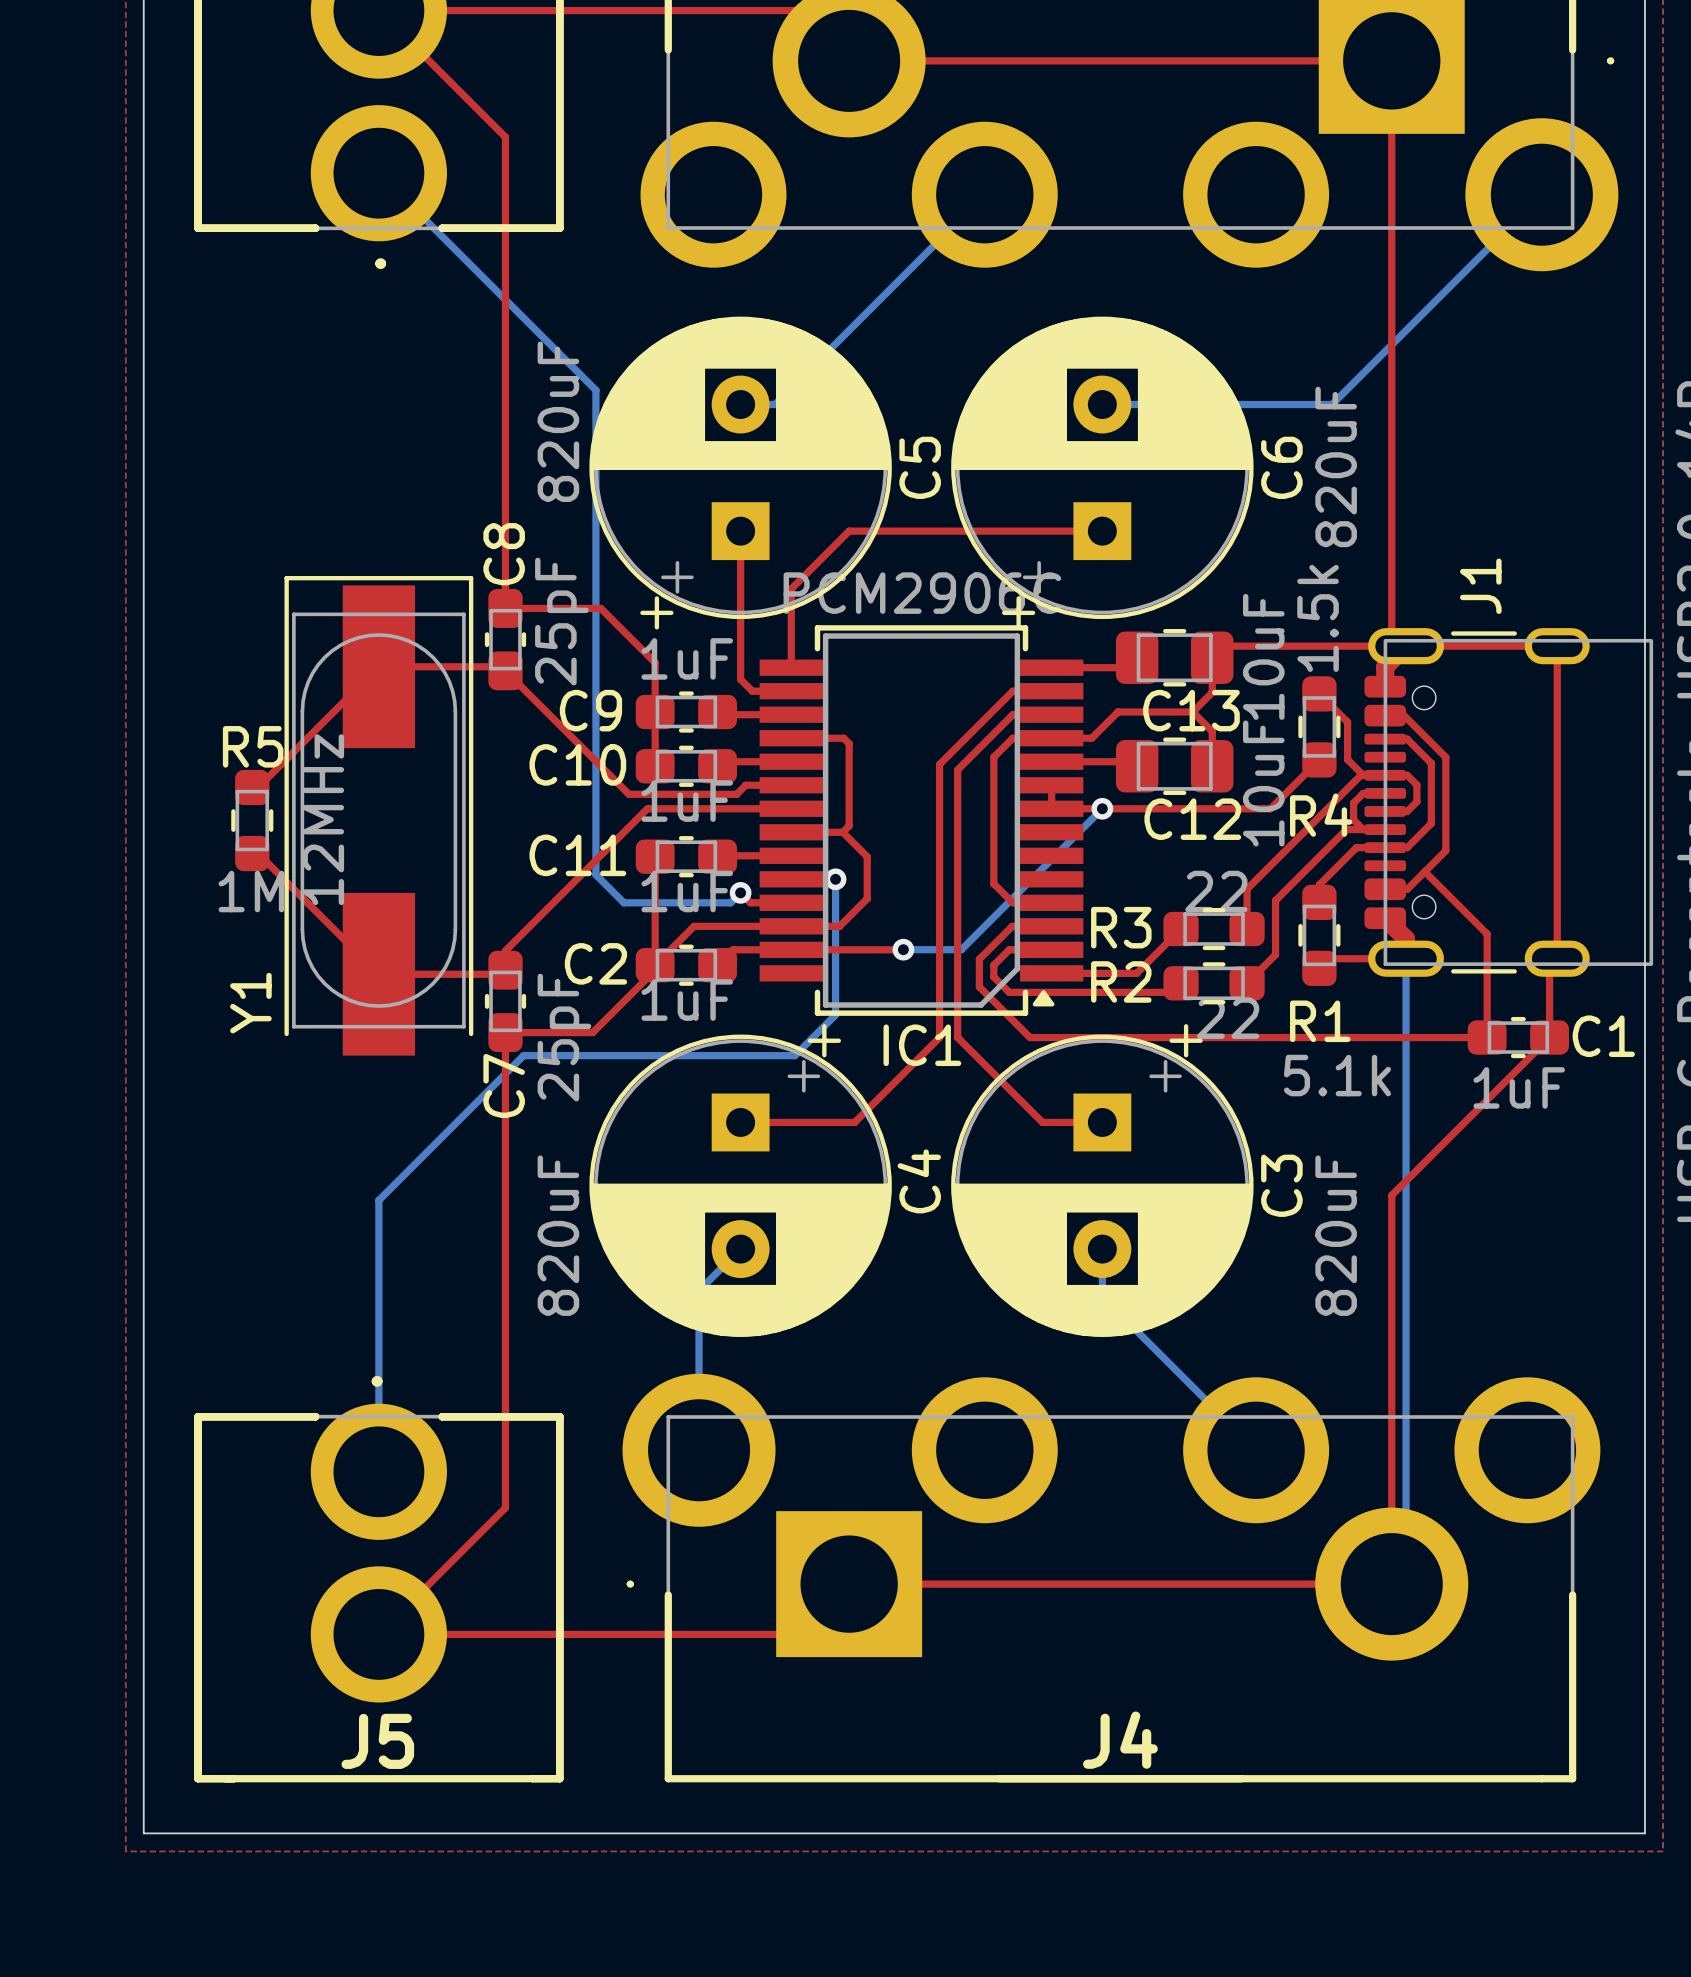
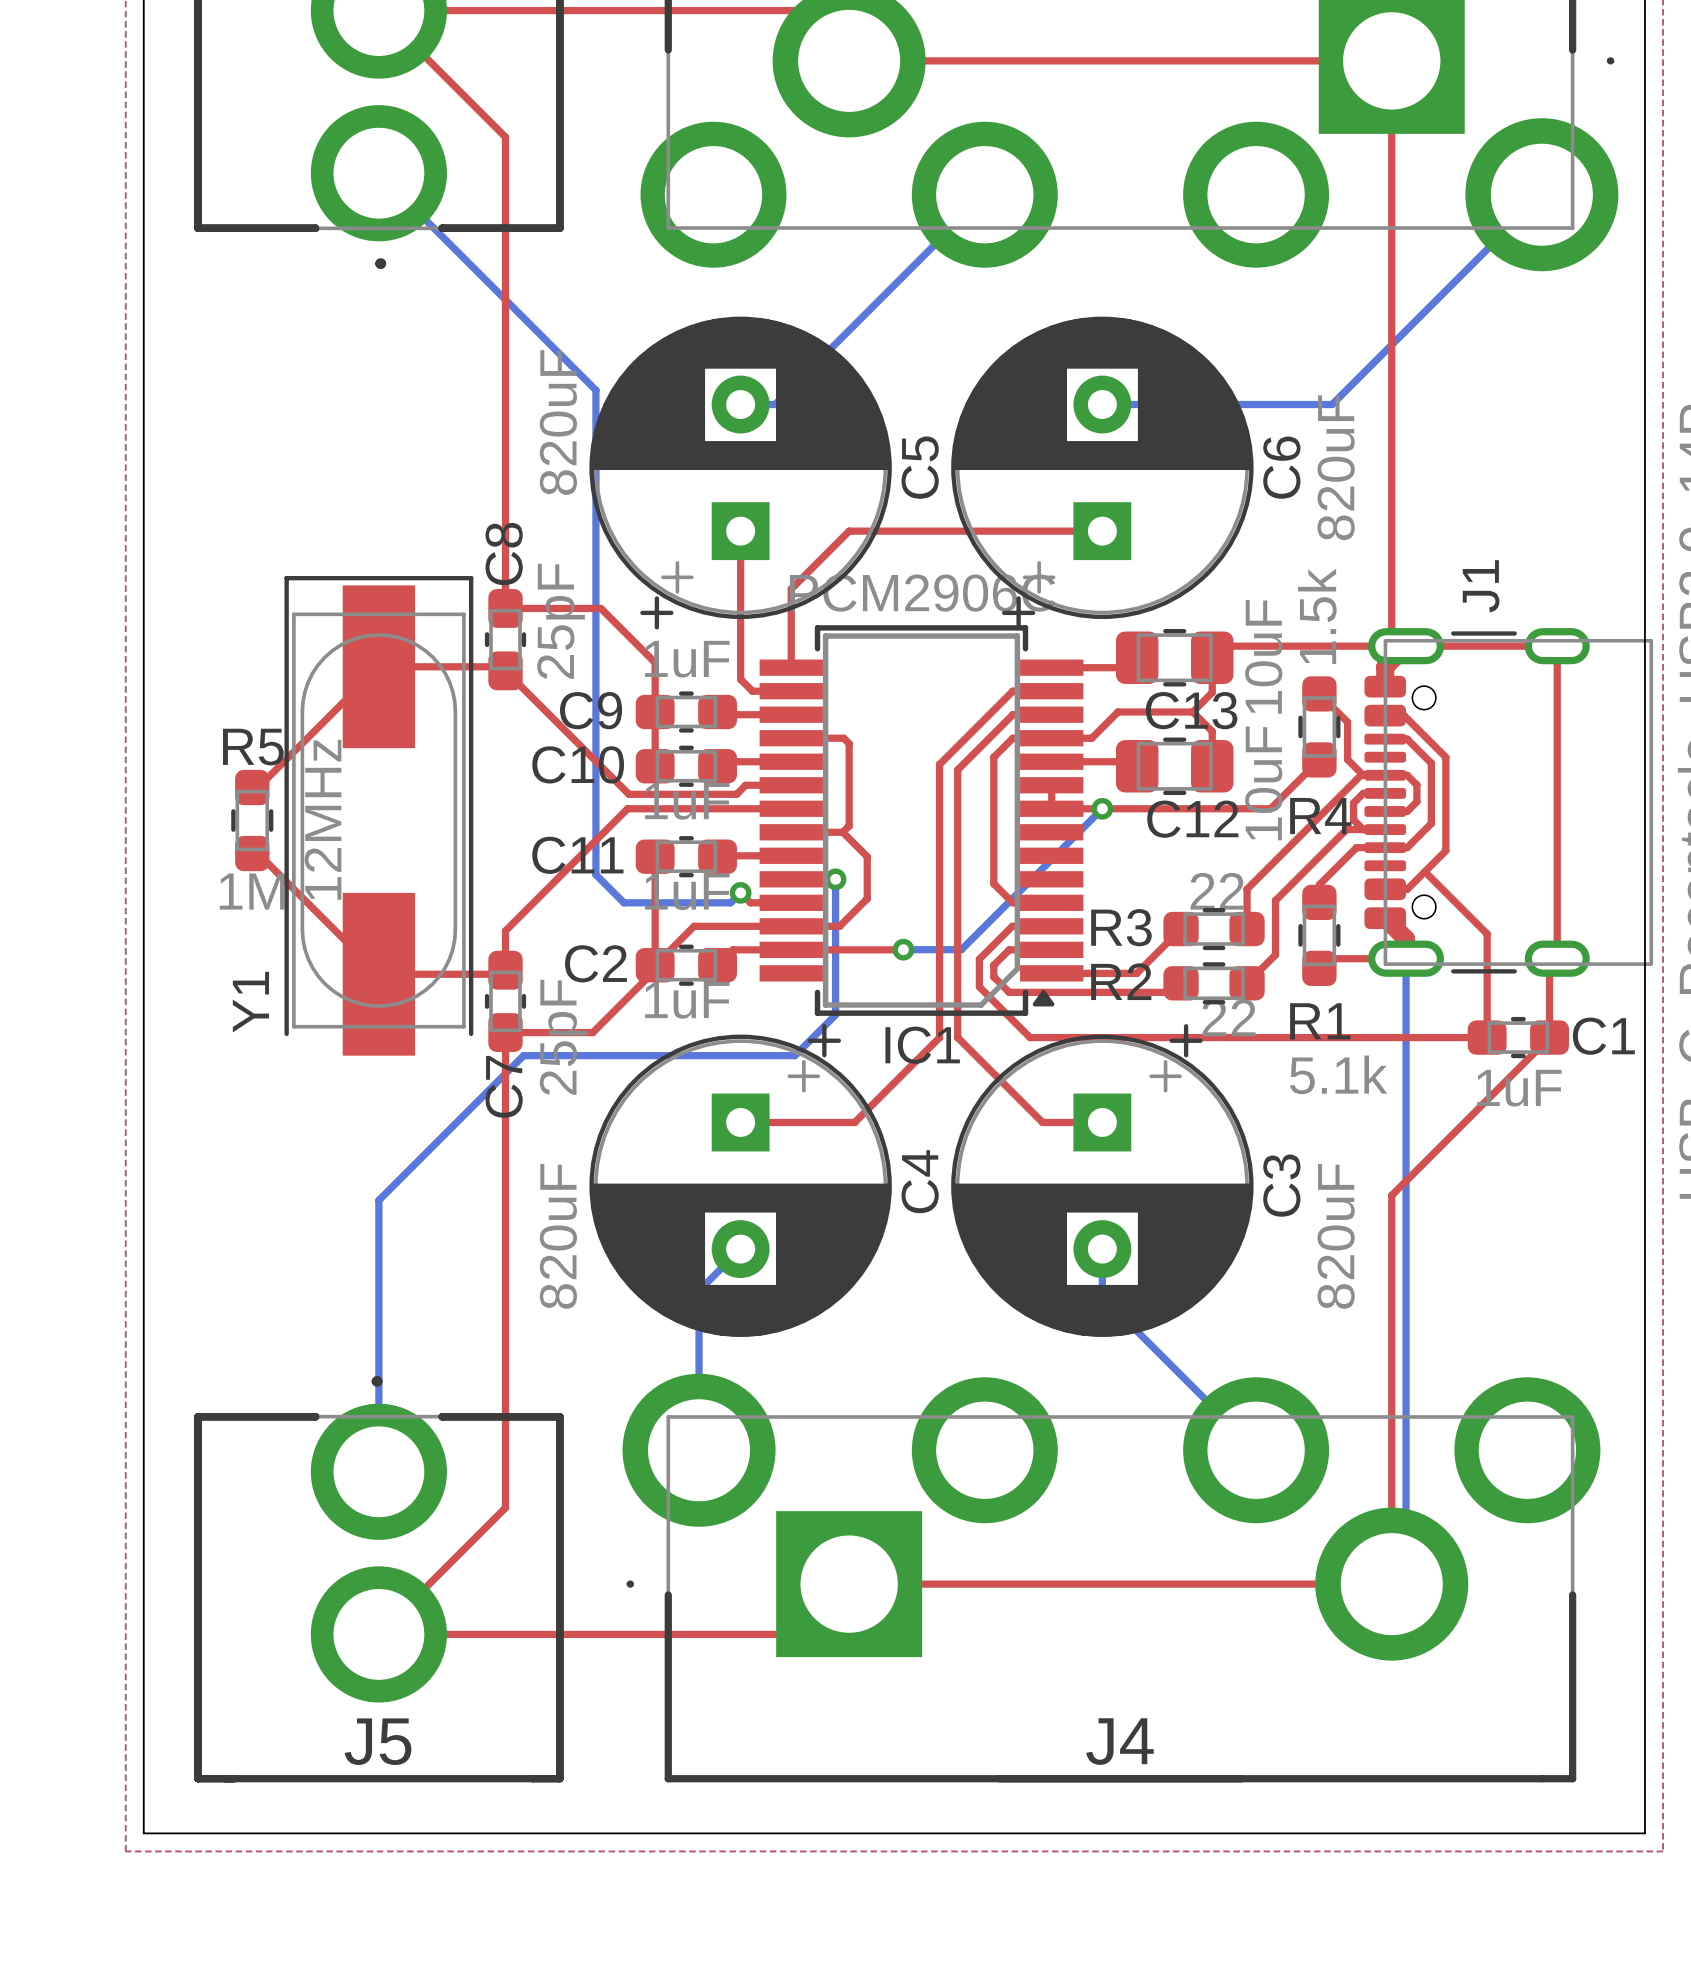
top track: (647, 808) (505, 950) -> (647, 808) (627, 808) (505, 930) (505, 950)

